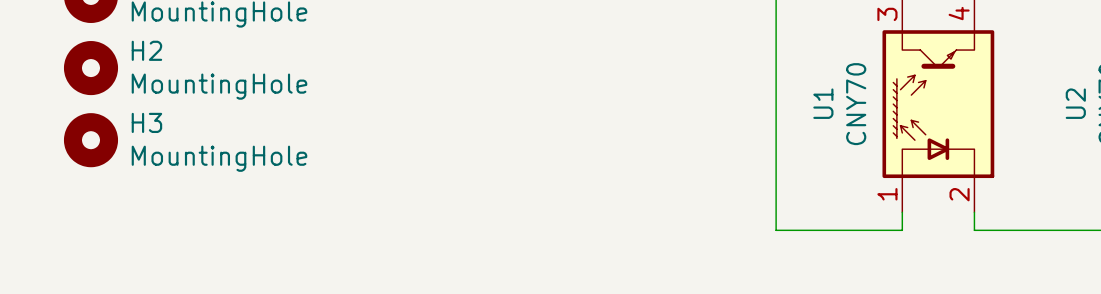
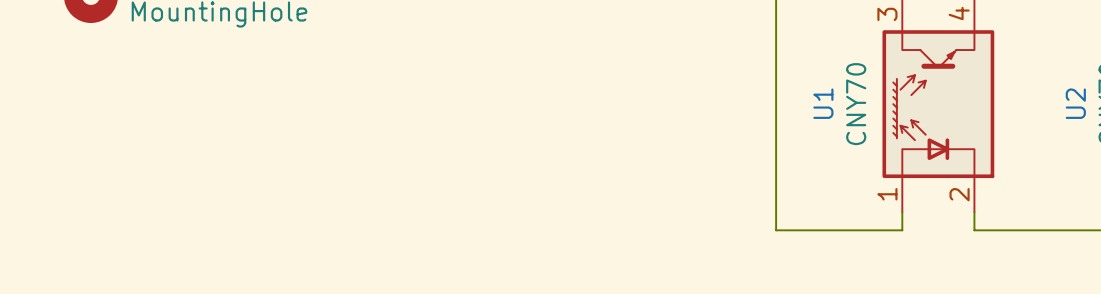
H2: MountingHole (90, 68) -> none
H3: MountingHole (90, 140) -> none

